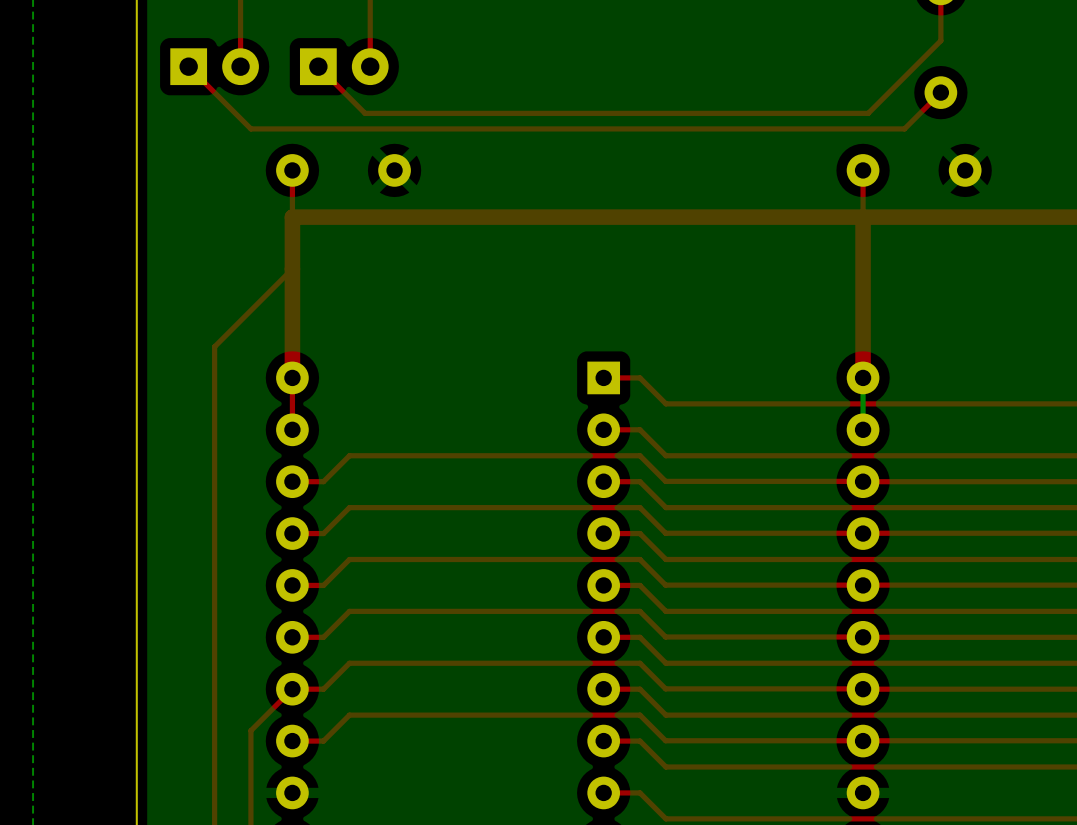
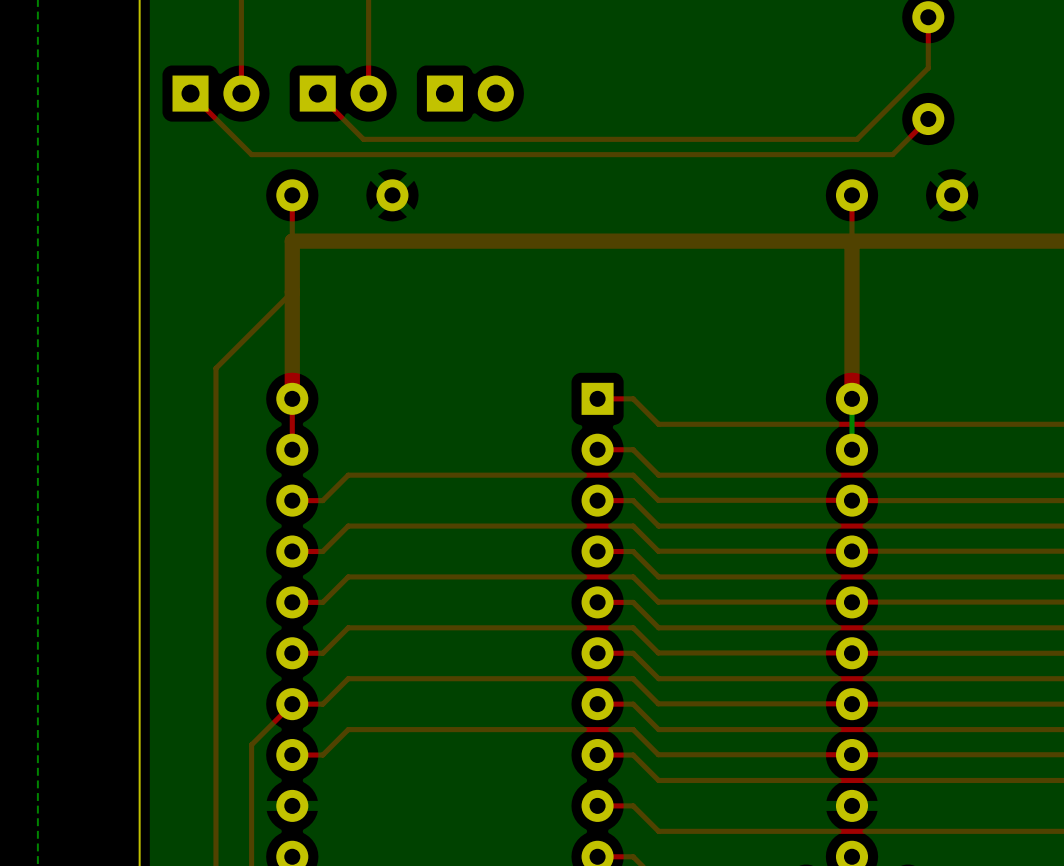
part: none -> (470, 93)

